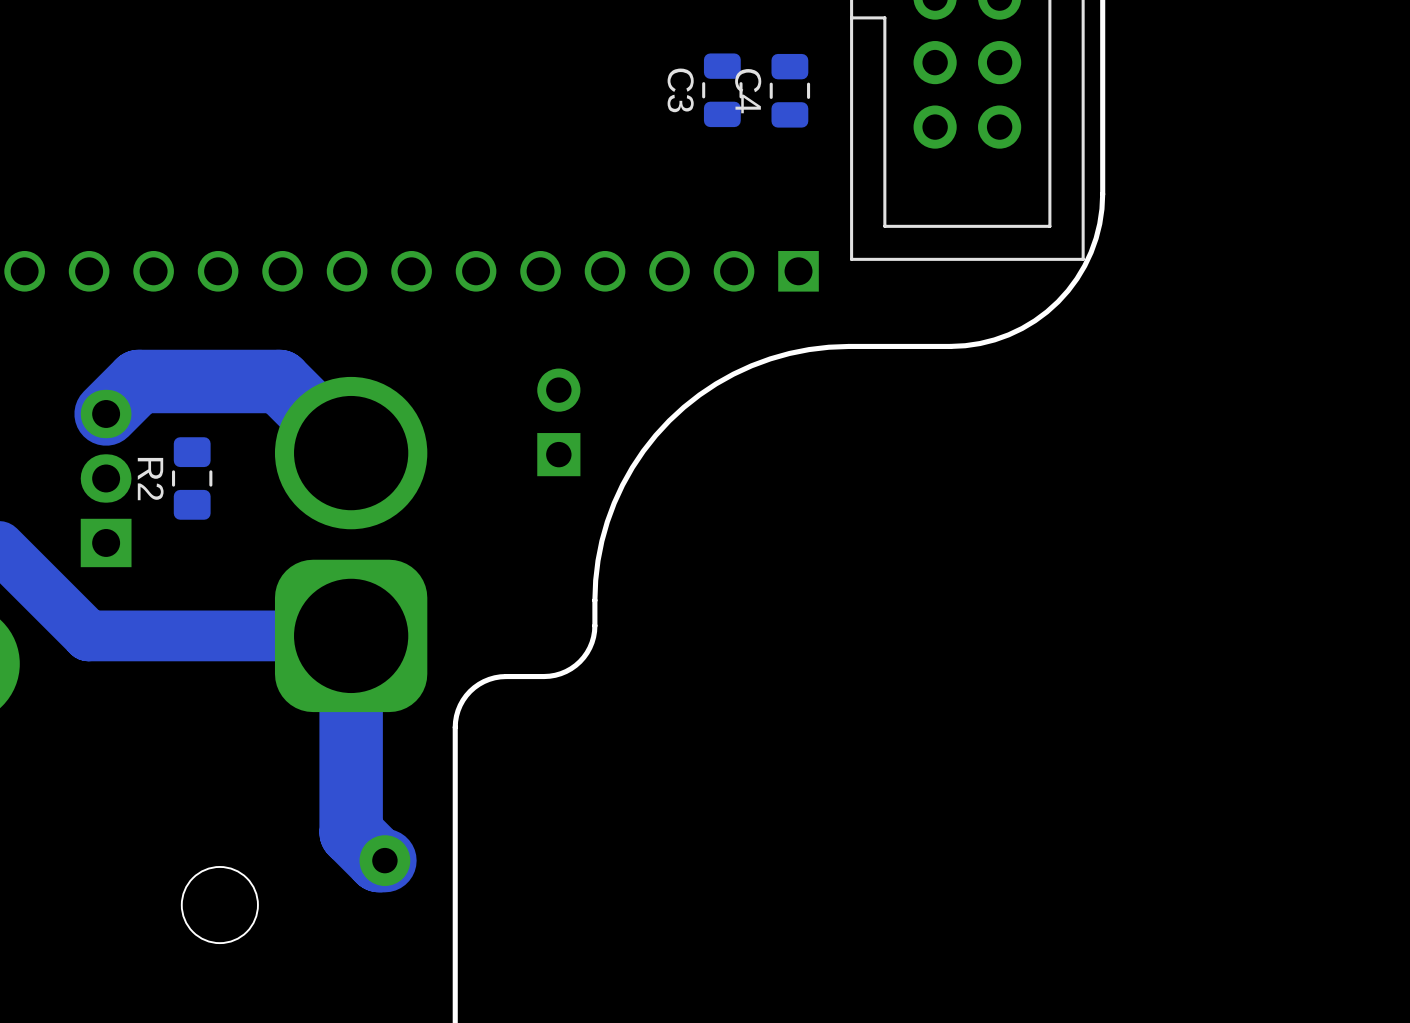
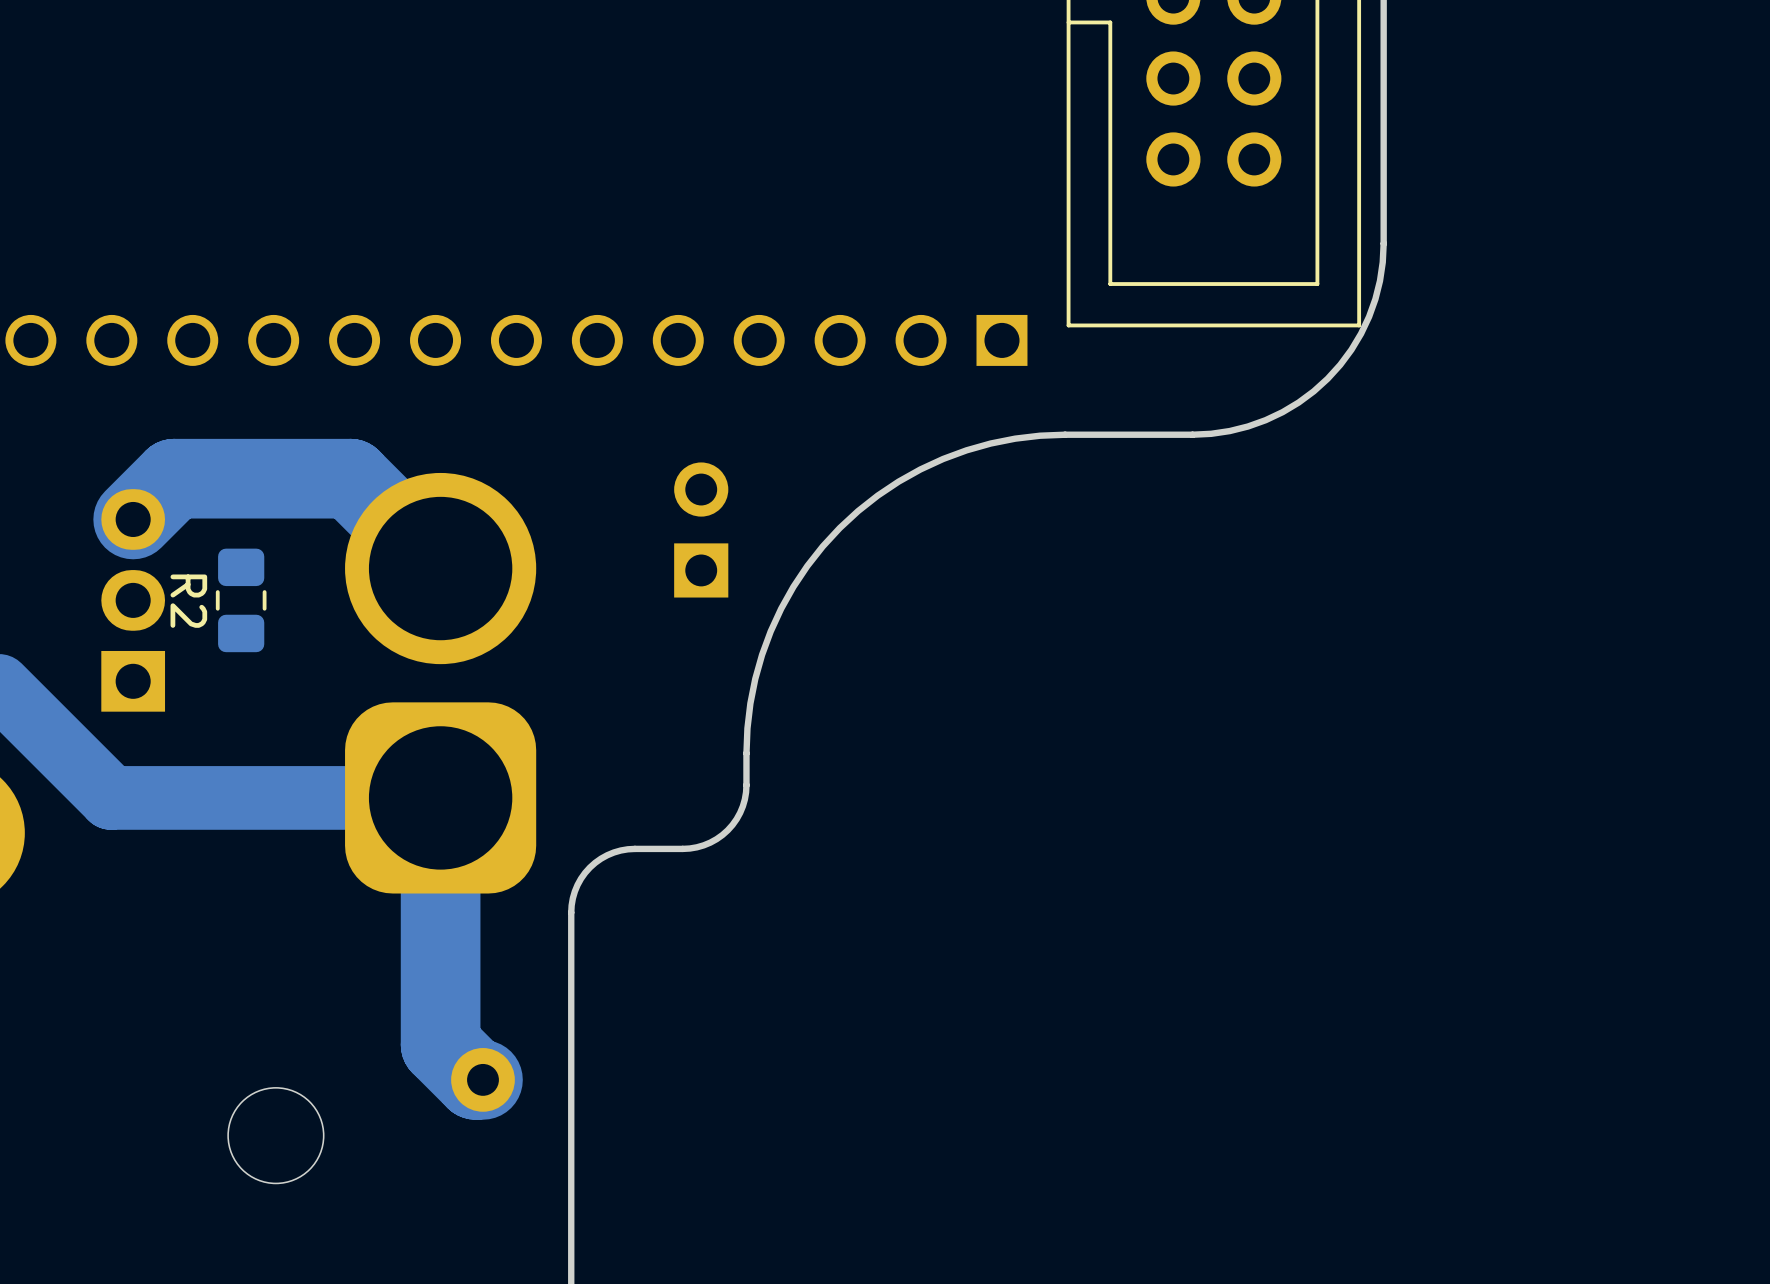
C3: (722, 90) -> none
C4: (789, 90) -> none

